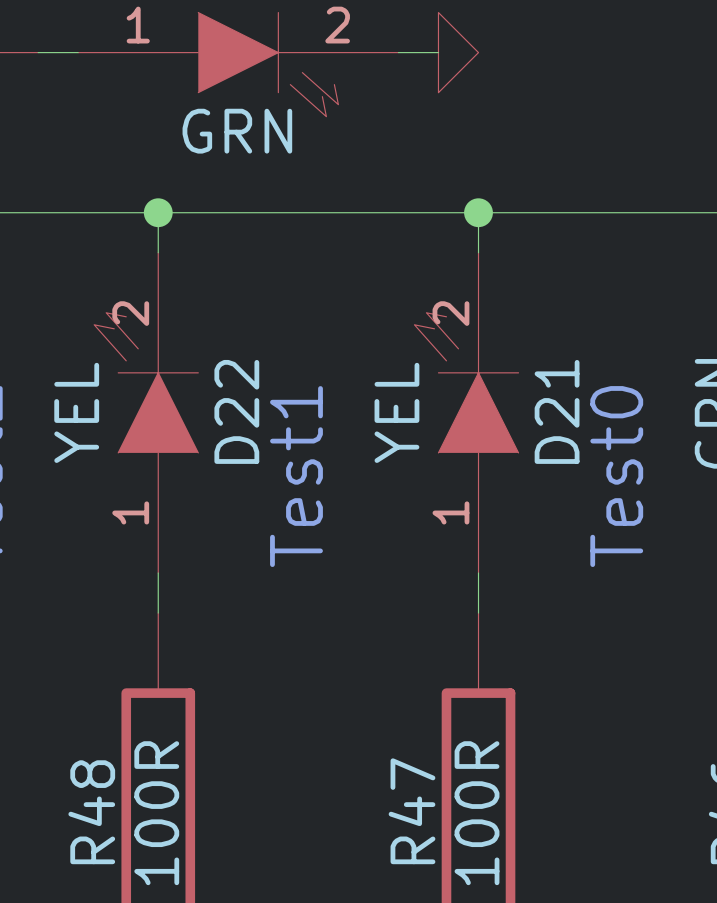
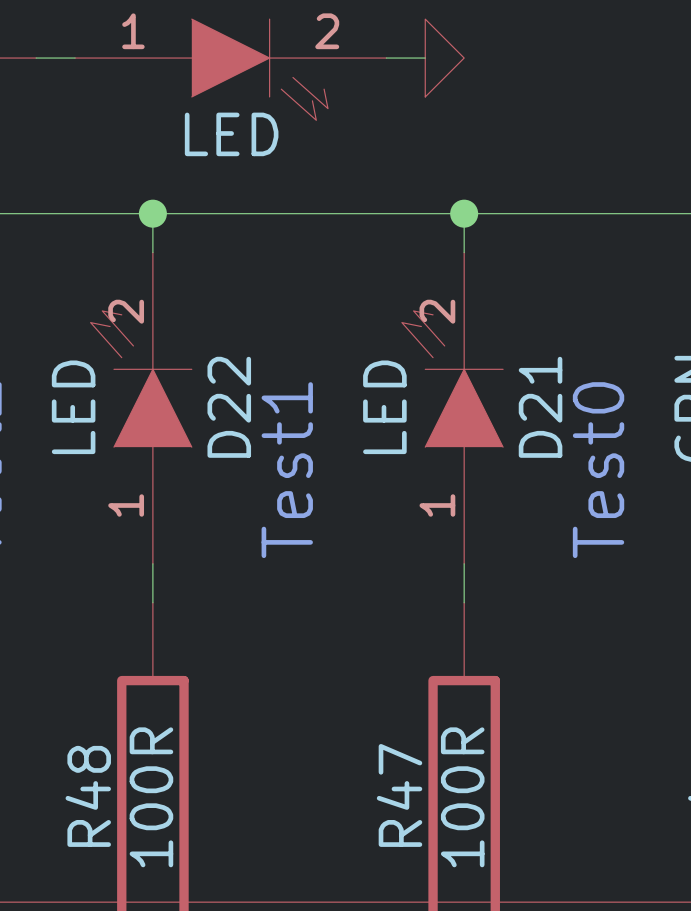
part value: GRN (237, 131) -> LED (231, 134)
D22 value: YEL (76, 412) -> LED (73, 407)
D21 value: YEL (396, 412) -> LED (384, 407)

